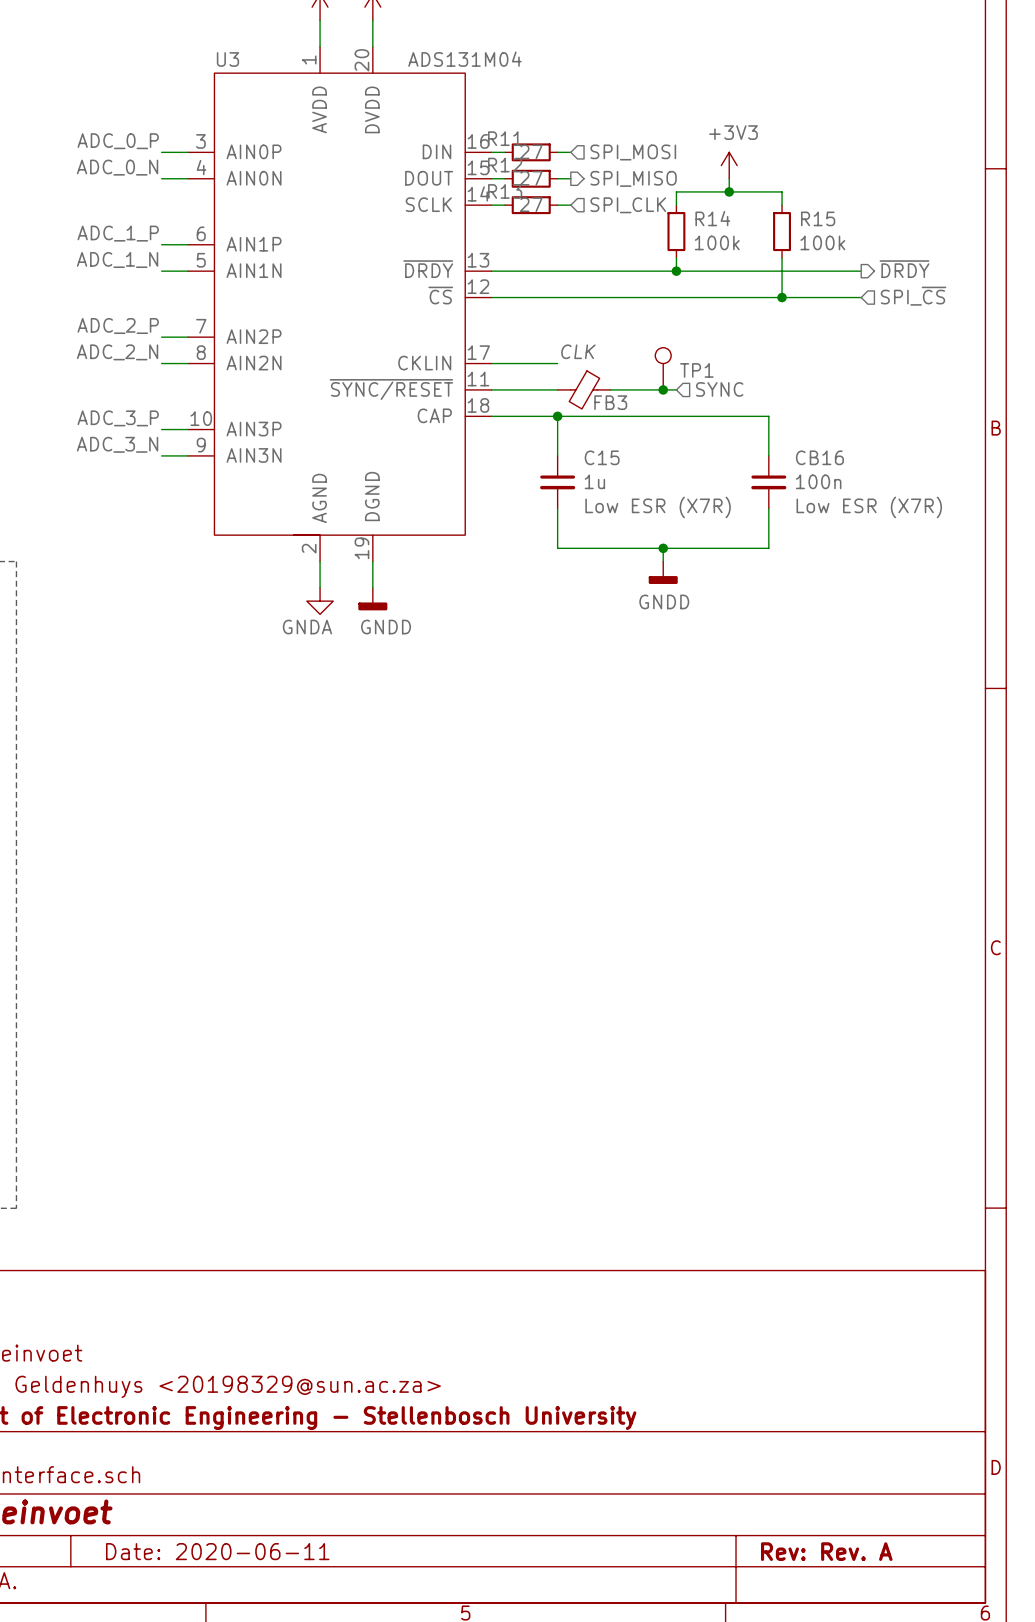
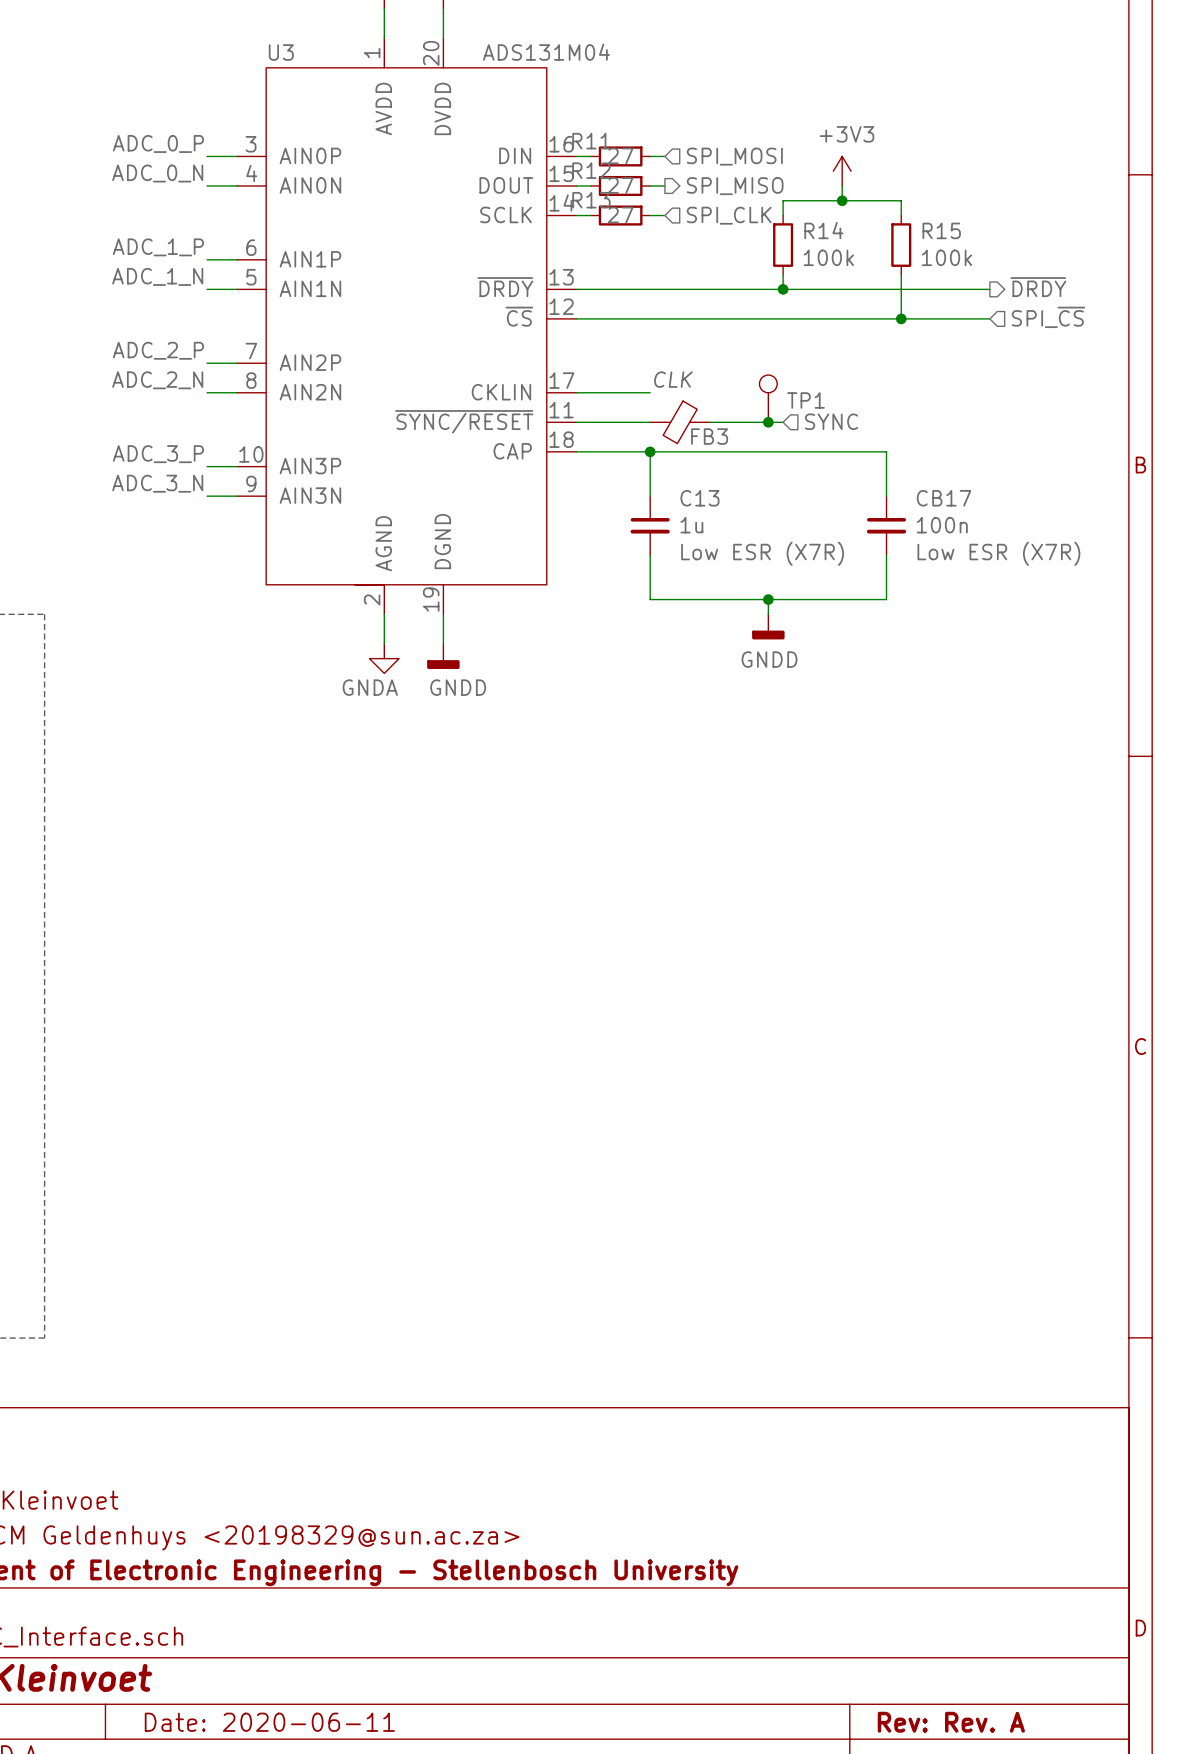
C15 name: C15 (602, 457) -> C13 (699, 498)
CB16 name: CB16 (819, 457) -> CB17 (944, 498)

